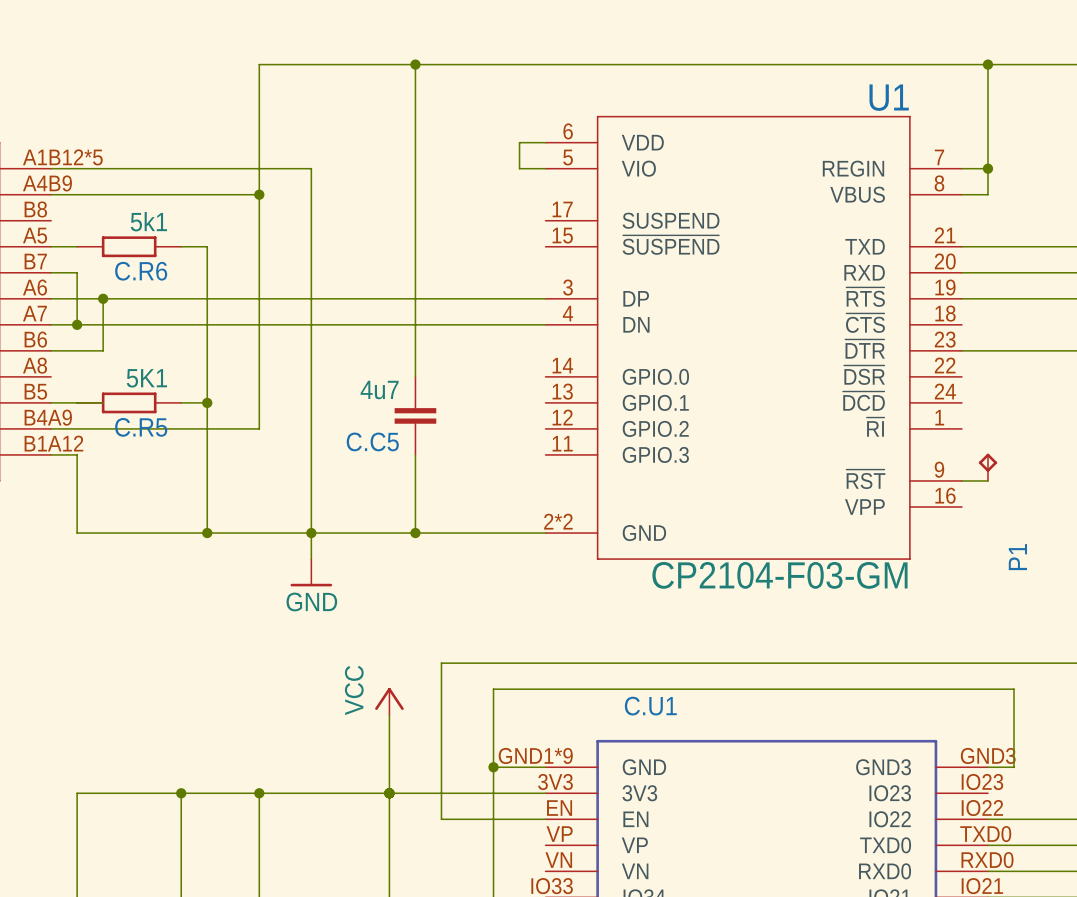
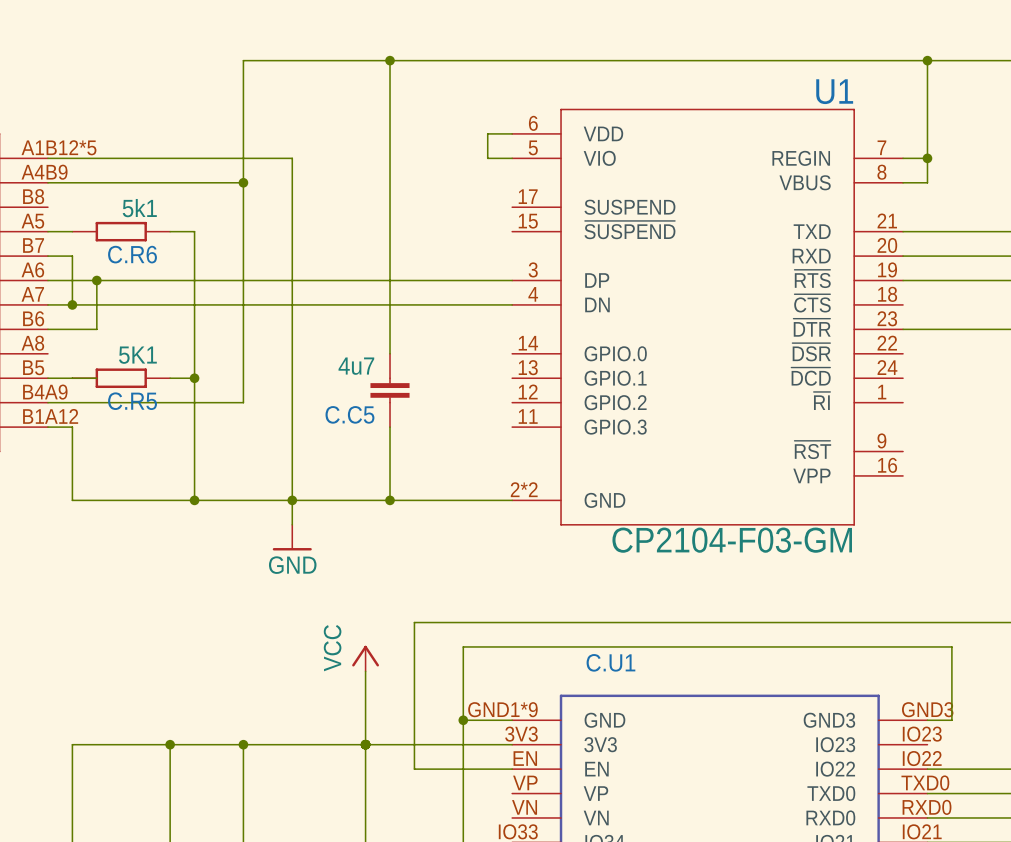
P1: (987, 467) -> none
wire: (961, 480) (987, 480) -> none

